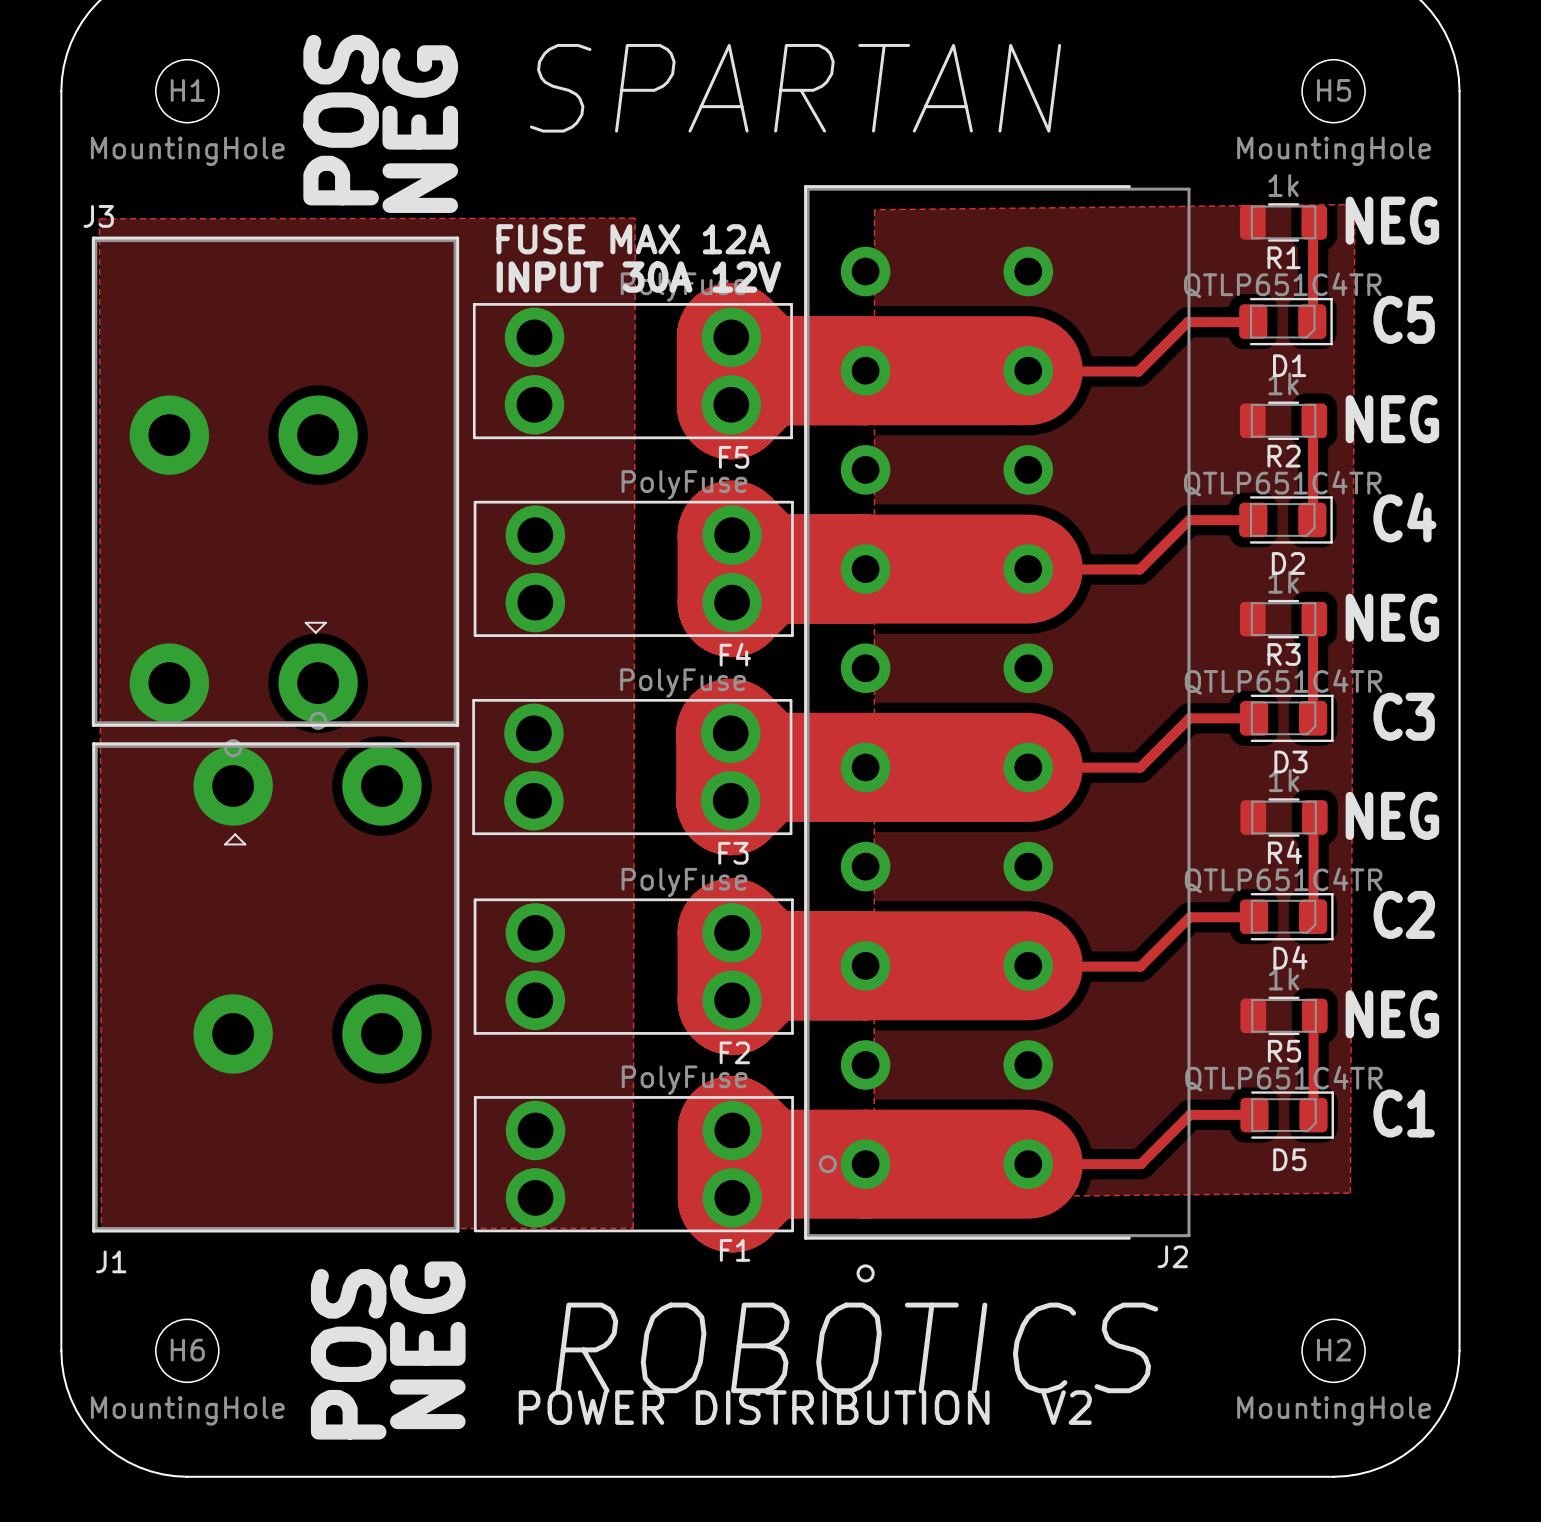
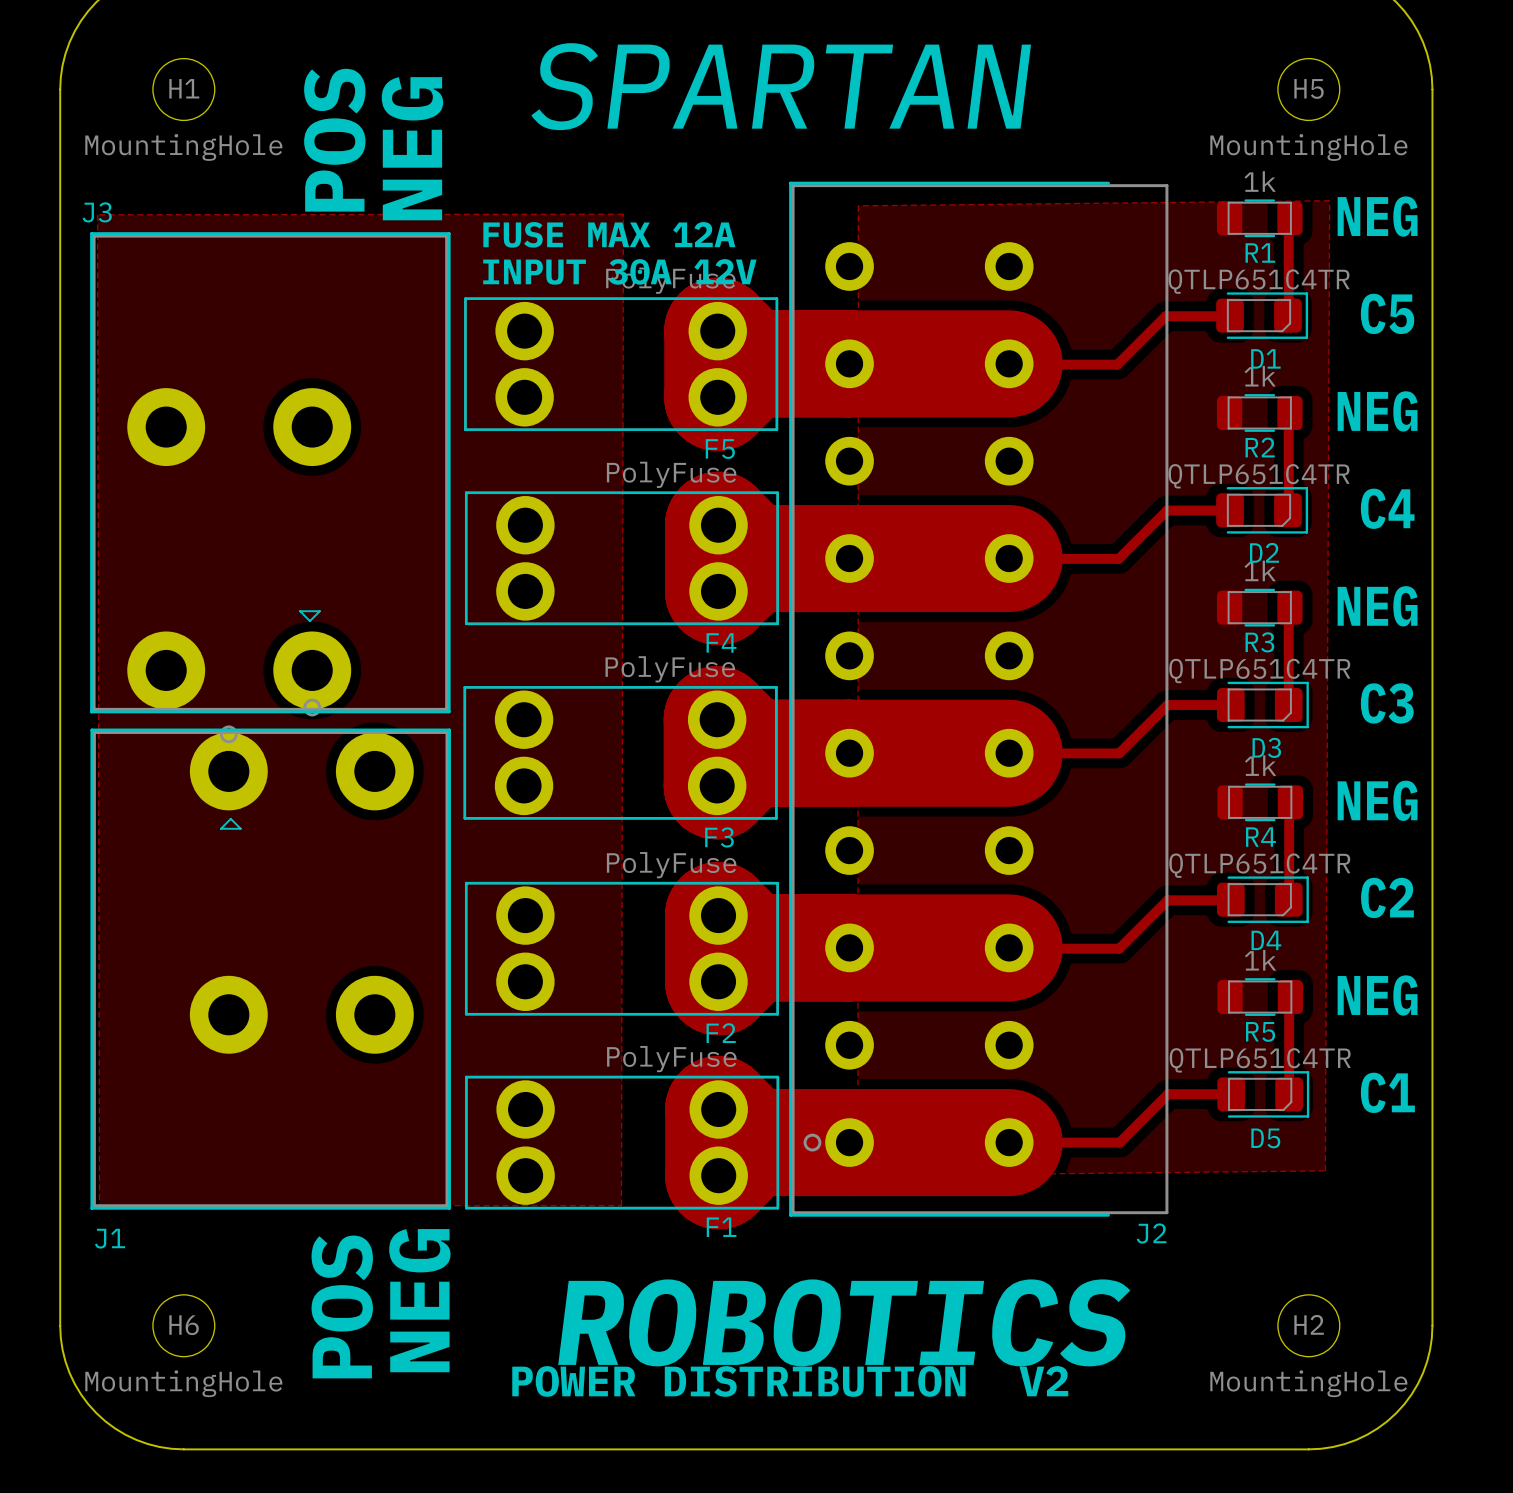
J2 footprint: [804, 185, 1191, 1283] -> [789, 181, 1169, 1217]

